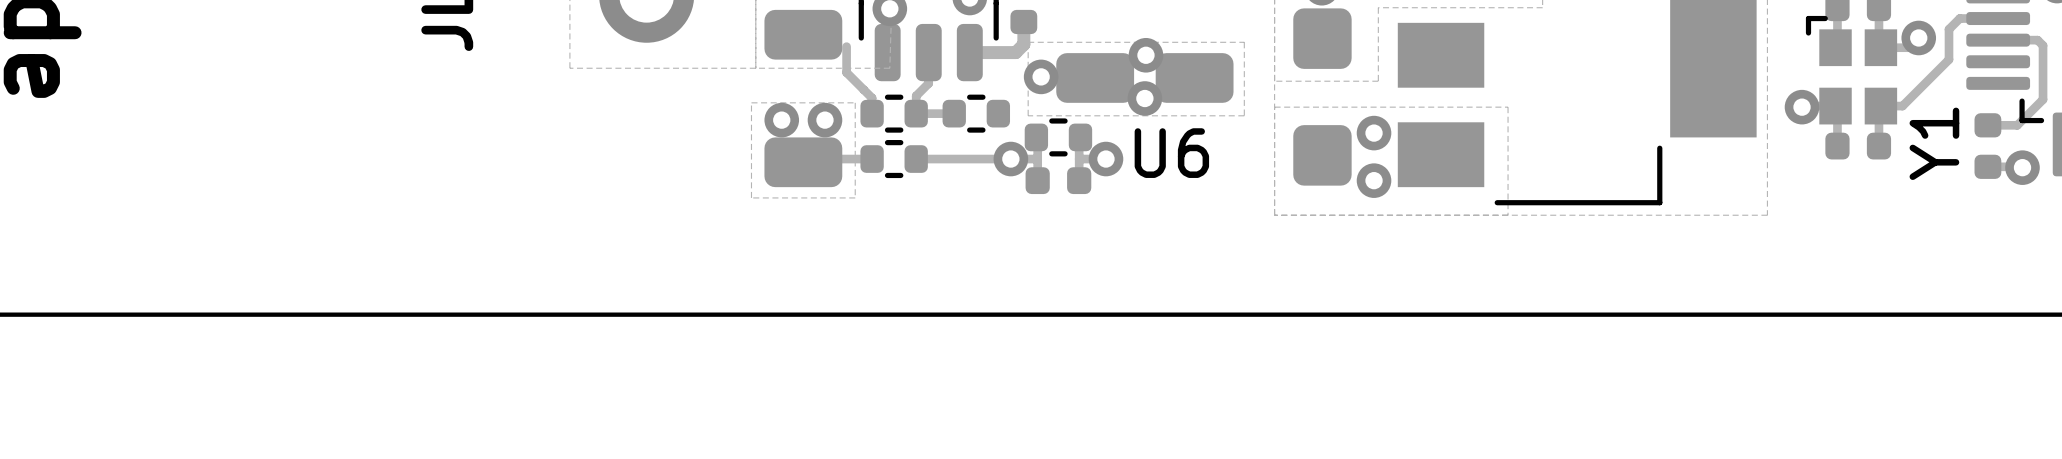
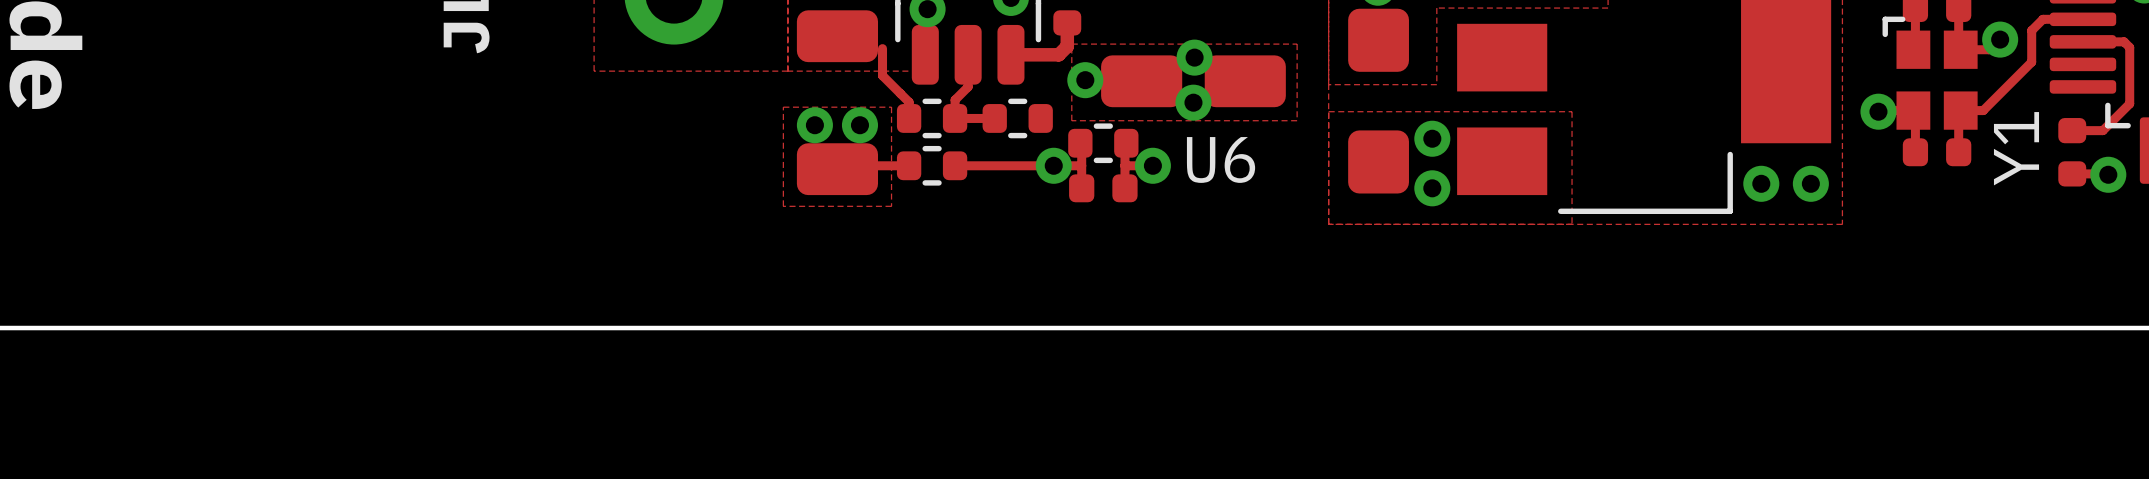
via: none -> (1761, 183)
via: none -> (1810, 183)

